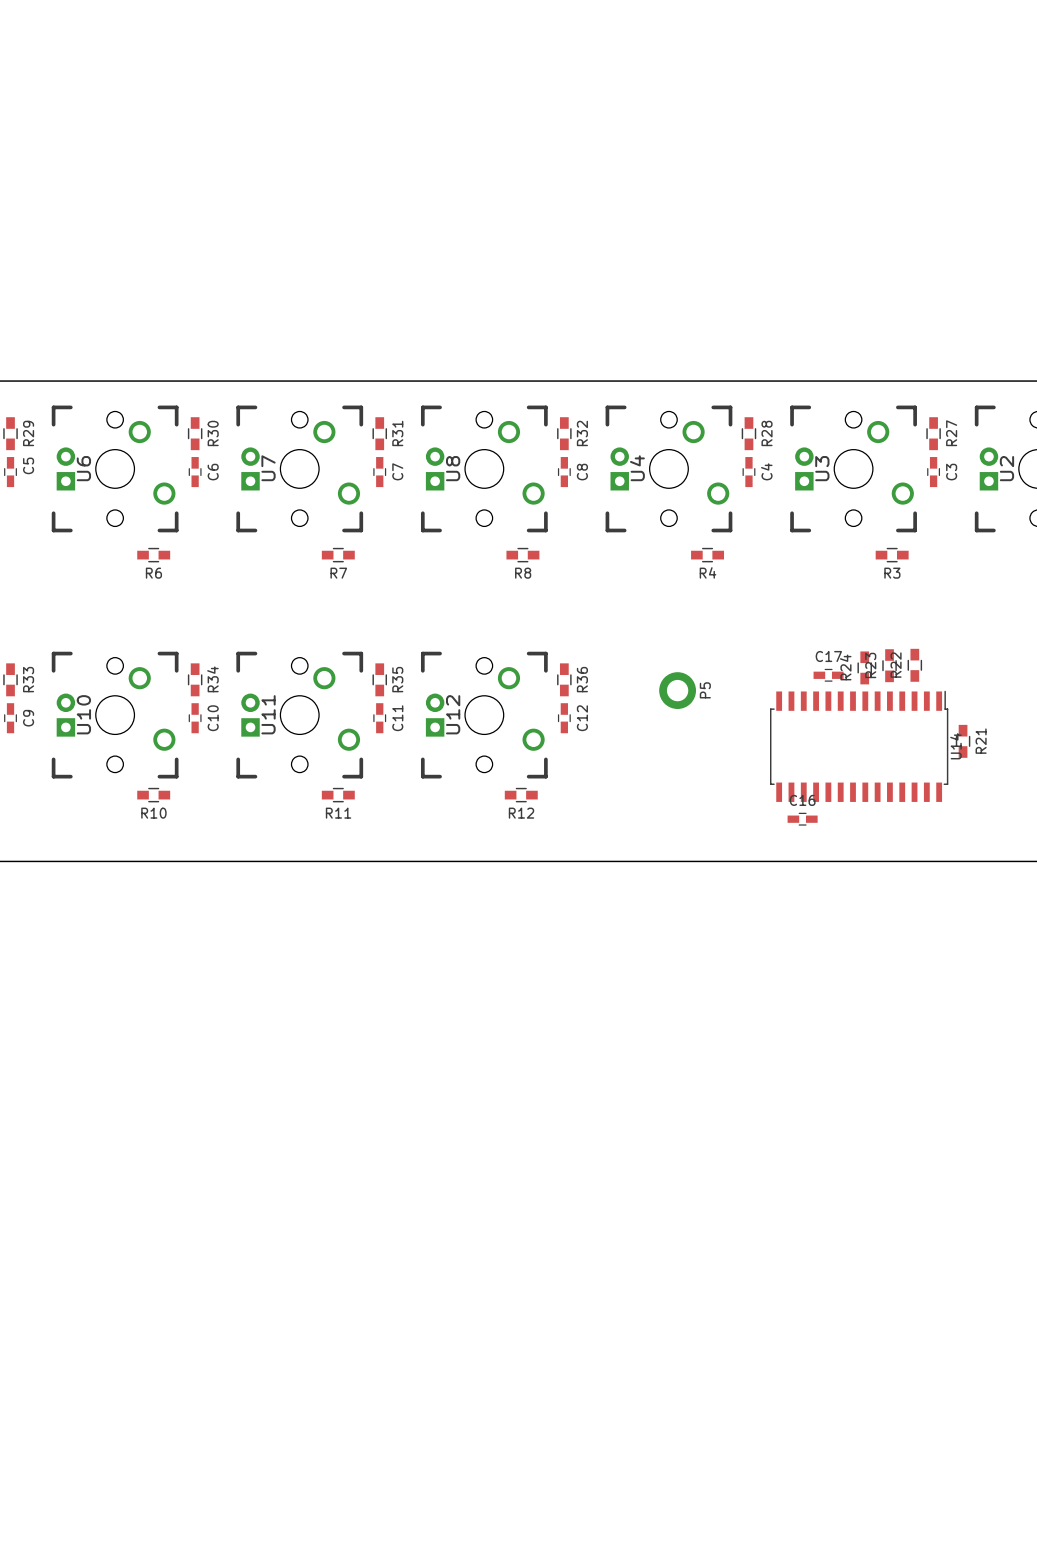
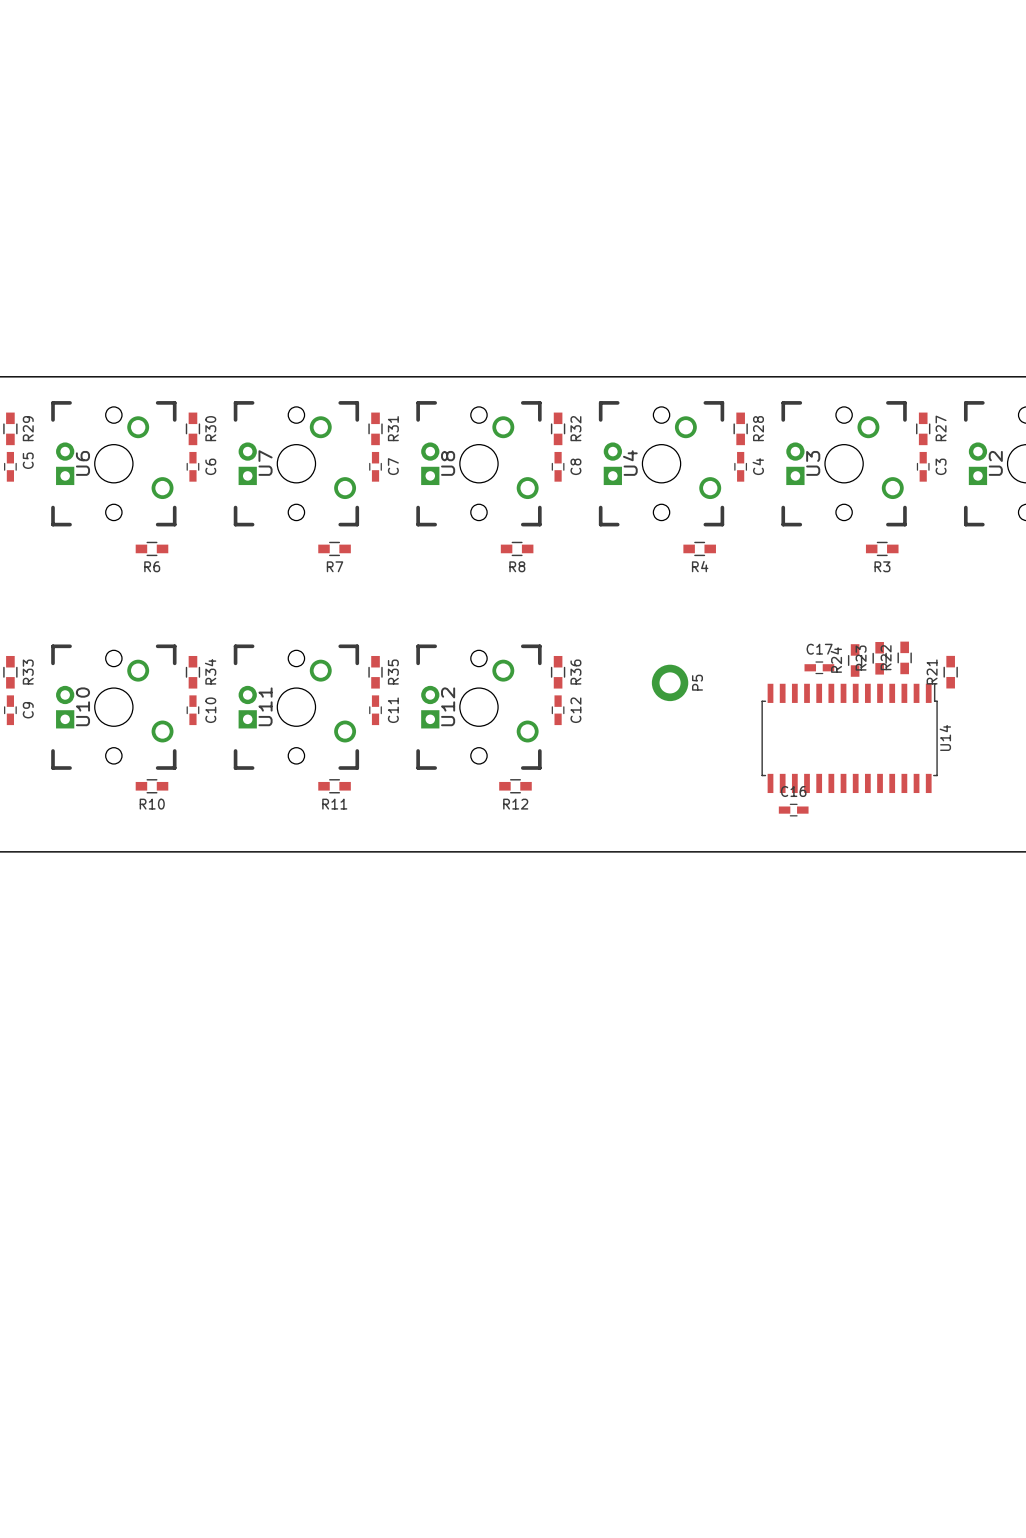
R21 position: (963, 741) -> (950, 672)
R21 name position: R21 (981, 741) -> R21 (932, 671)

